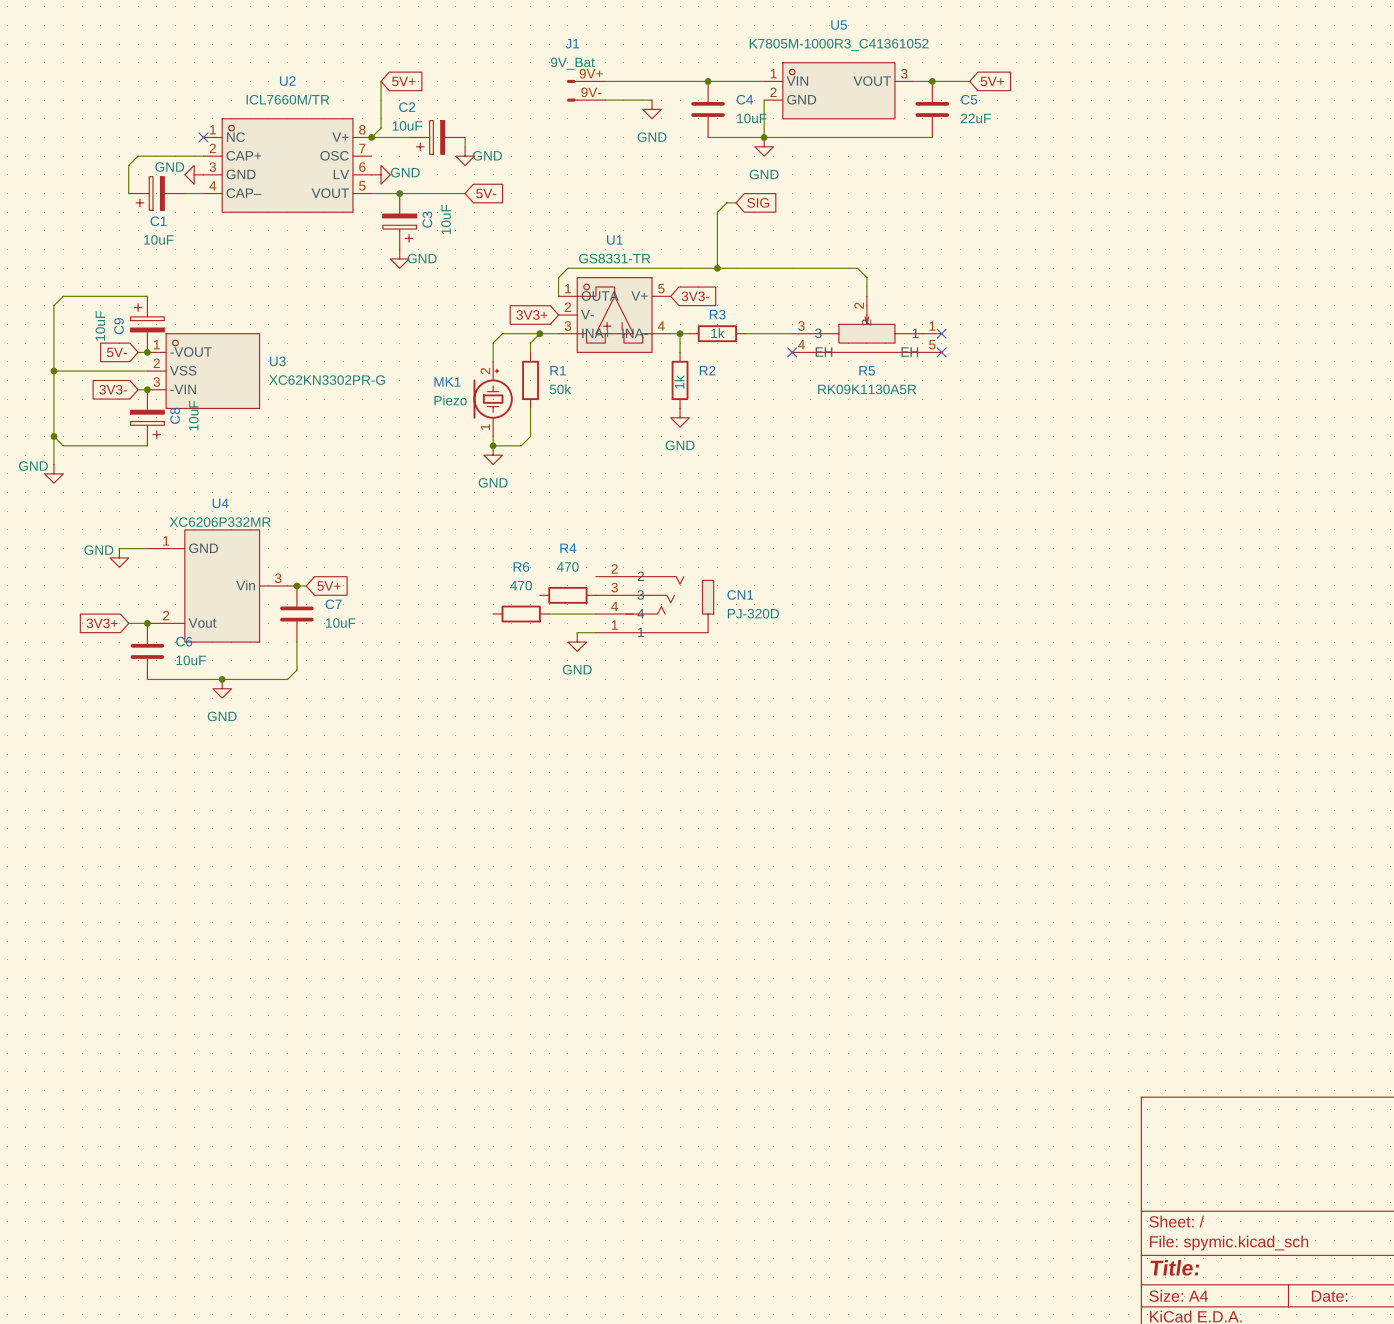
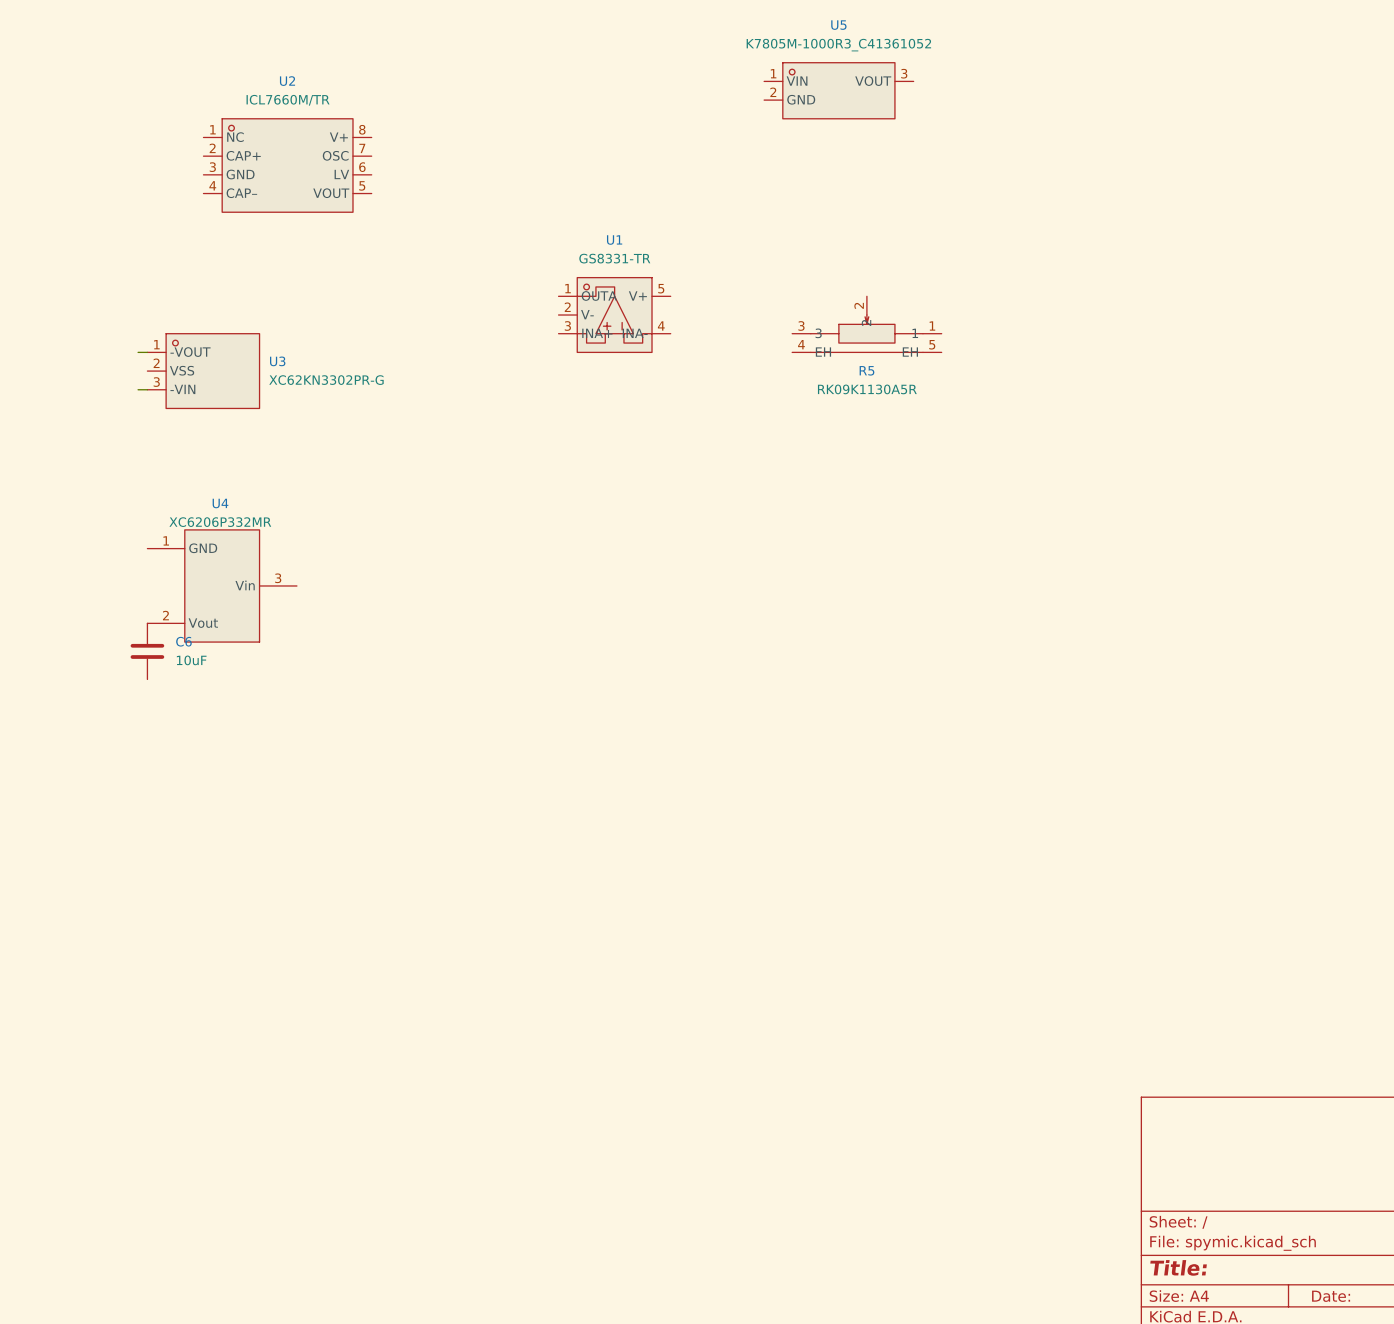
wire: (381, 81) (381, 128) (371, 137) (409, 137) -> none
global label: 5V+ (403, 81) -> none
wire: (605, 81) (764, 81) -> none
junction: (708, 81) -> none
wire: (913, 81) (969, 81) -> none
junction: (932, 81) -> none
global label: 5V+ (992, 81) -> none
J1: 9V_Bat (586, 90) -> none
wire: (605, 100) (652, 100) -> none
wire: (764, 100) (764, 137) -> none
power symbol: GND (652, 109) -> none
C4: 10uF (708, 109) -> none
C5: 22uF (932, 109) -> none
no-connect mark: (203, 137) -> none
junction: (371, 137) -> none
C2: 10uF (437, 137) -> none
wire: (465, 137) (465, 146) -> none
wire: (708, 137) (932, 137) -> none
junction: (764, 137) -> none
power symbol: GND (764, 146) -> none
wire: (203, 156) (138, 156) (128, 165) (128, 193) -> none
power symbol: GND (465, 156) -> none
power symbol: GND (194, 174) -> none
power symbol: GND (381, 174) -> none
C1: 10uF (156, 193) -> none
wire: (184, 193) (203, 193) -> none
wire: (371, 193) (465, 193) -> none
junction: (399, 193) -> none
global label: 5V- (486, 193) -> none
wire: (736, 202) (726, 202) (717, 212) (717, 268) -> none
global label: SIG (758, 202) -> none
C3: 10uF (399, 221) -> none
power symbol: GND (399, 258) -> none
junction: (717, 268) -> none
wire: (147, 296) (63, 296) (53, 305) (53, 464) -> none
wire: (558, 296) (558, 277) (567, 268) (857, 268) (866, 277) (866, 296) -> none
global label: 3V3- (695, 296) -> none
global label: 3V3+ (531, 315) -> none
C9: 10uF (147, 324) -> none
wire: (539, 333) (530, 343) (530, 352) -> none
junction: (539, 333) -> none
wire: (558, 333) (502, 333) (493, 343) (493, 361) -> none
wire: (670, 333) (689, 333) -> none
wire: (680, 333) (680, 352) -> none
junction: (680, 333) -> none
R3: 1k (717, 333) -> none
wire: (745, 333) (792, 333) -> none
no-connect mark: (941, 333) -> none
global label: 5V- (116, 352) -> none
junction: (147, 352) -> none
no-connect mark: (792, 352) -> none
no-connect mark: (941, 352) -> none
wire: (53, 371) (147, 371) -> none
junction: (53, 371) -> none
R1: 50k (530, 380) -> none
R2: 1k (680, 380) -> none
global label: 3V3- (113, 389) -> none
junction: (147, 389) -> none
MK1: Piezo (493, 399) -> none
wire: (530, 408) (530, 436) (521, 445) (493, 445) (493, 436) -> none
C8: 10uF (147, 417) -> none
power symbol: GND (680, 417) -> none
wire: (53, 436) (63, 445) (147, 445) -> none
junction: (53, 436) -> none
junction: (493, 445) -> none
power symbol: GND (493, 455) -> none
power symbol: GND (53, 473) -> none
wire: (119, 548) (147, 548) -> none
power symbol: GND (119, 557) -> none
wire: (296, 585) (306, 585) -> none
junction: (296, 585) -> none
global label: 5V+ (328, 586) -> none
R4: 470 (567, 595) -> none
CN1: PJ-320D (654, 604) -> none
C7: 10uF (296, 614) -> none
R6: 470 (521, 614) -> none
wire: (549, 614) (595, 614) -> none
global label: 3V3+ (102, 623) -> none
wire: (128, 623) (147, 623) -> none
junction: (147, 623) -> none
wire: (577, 632) (595, 632) -> none
wire: (296, 642) (296, 670) (287, 679) (147, 679) -> none
power symbol: GND (577, 642) -> none
junction: (222, 679) -> none
power symbol: GND (222, 688) -> none

